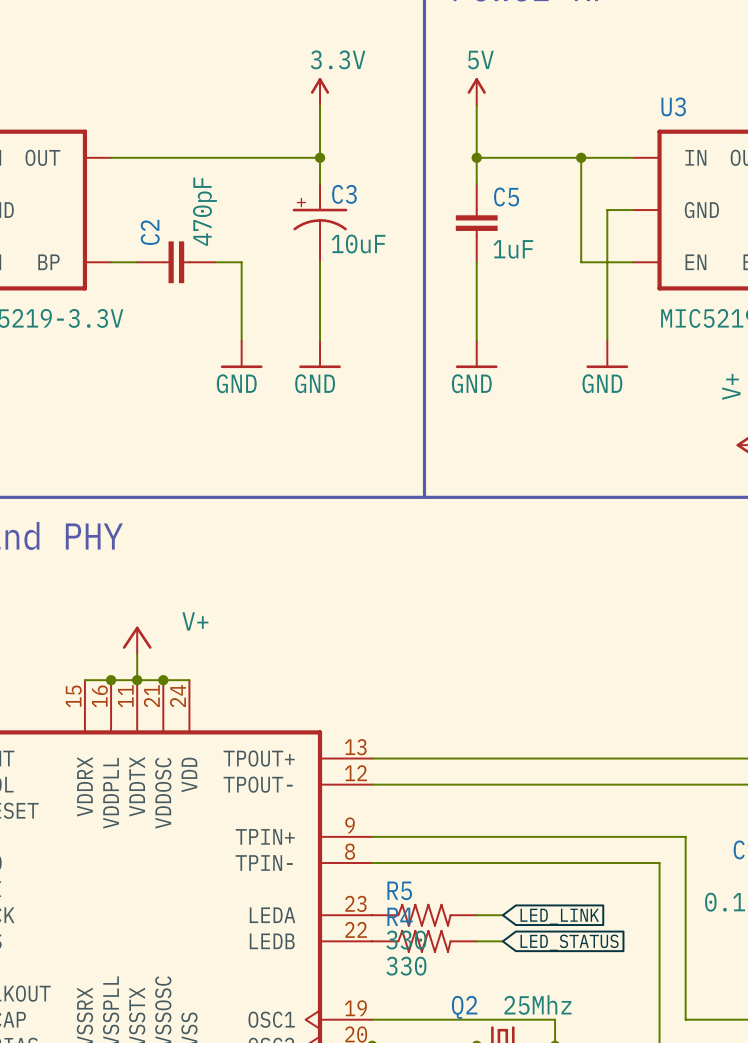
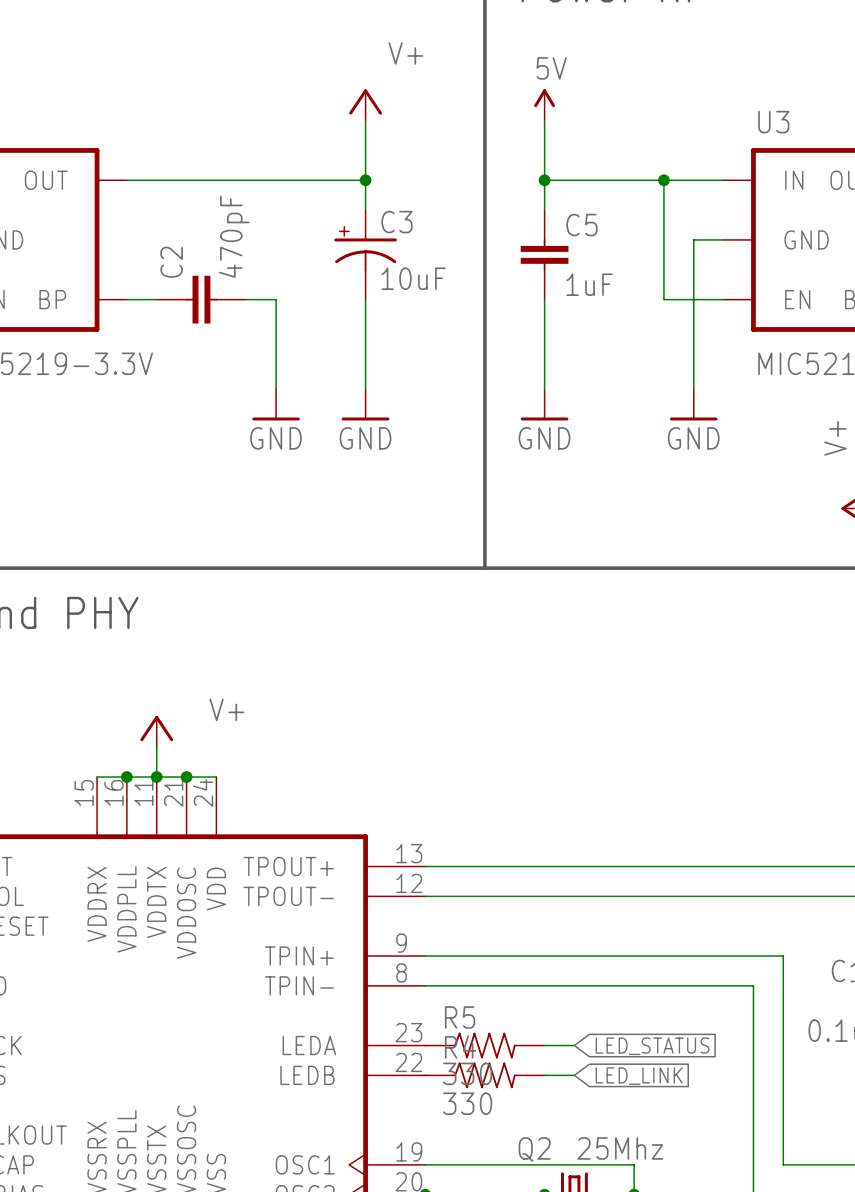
power symbol: 3.3V (320, 91) -> V+ (365, 104)
global label: LED_LINK (559, 916) -> LED_STATUS (652, 1046)
global label: LED_STATUS (569, 942) -> LED_LINK (639, 1076)

